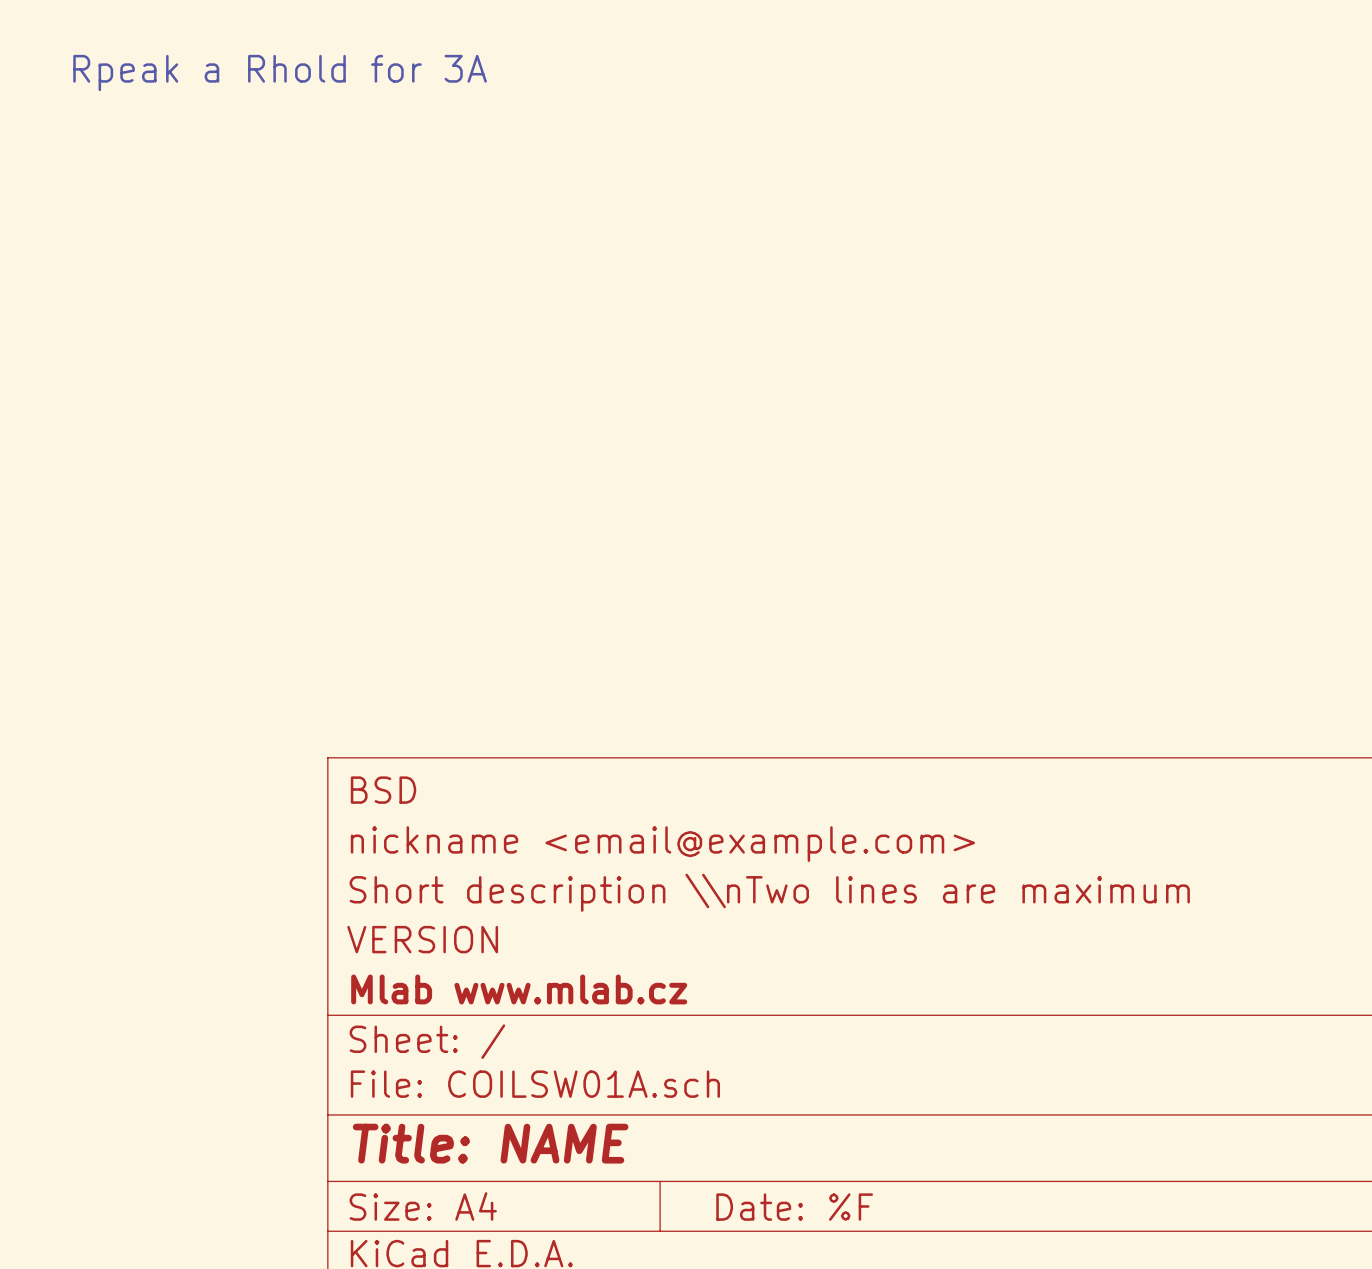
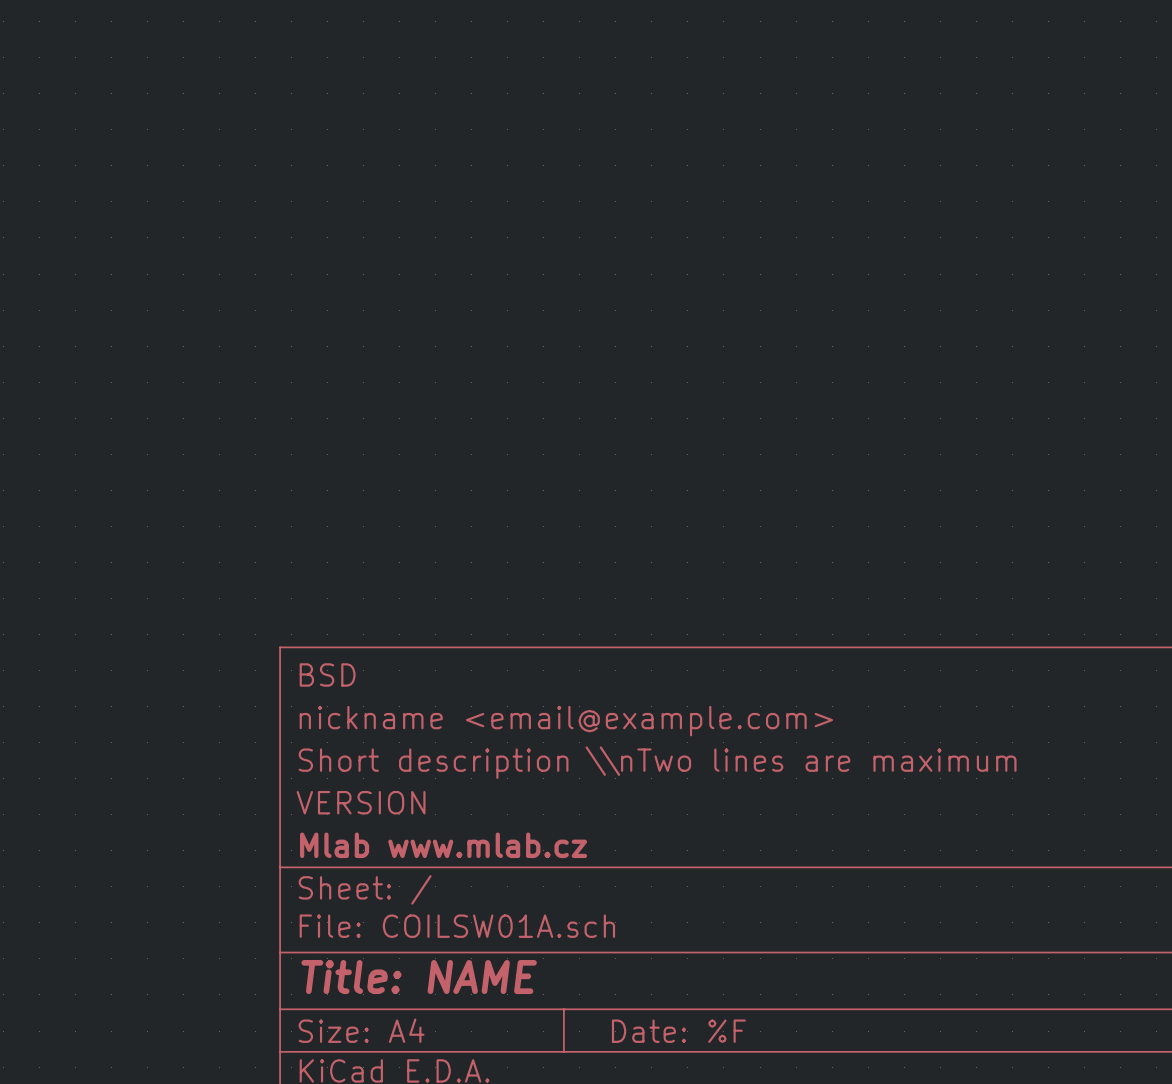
text: Rpeak a Rhold for 3A (280, 73) -> none

